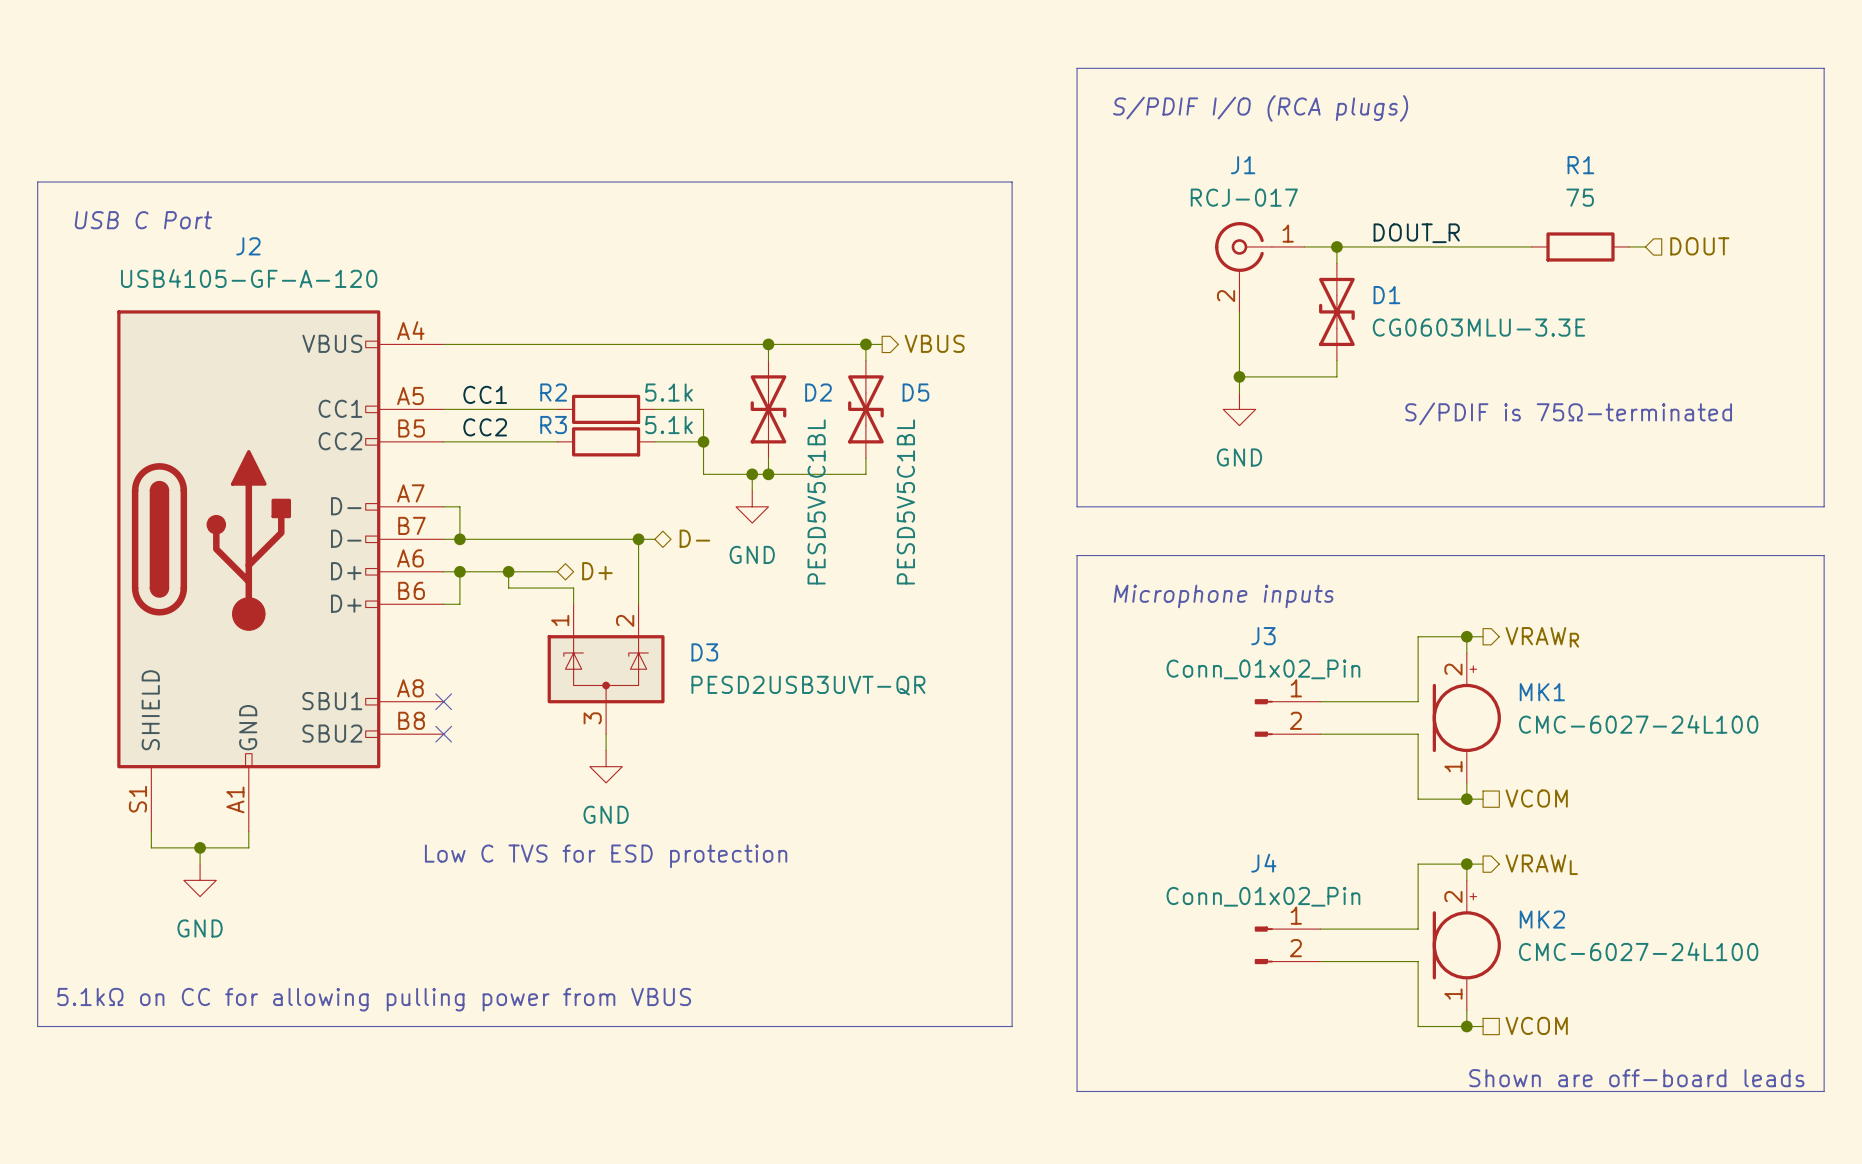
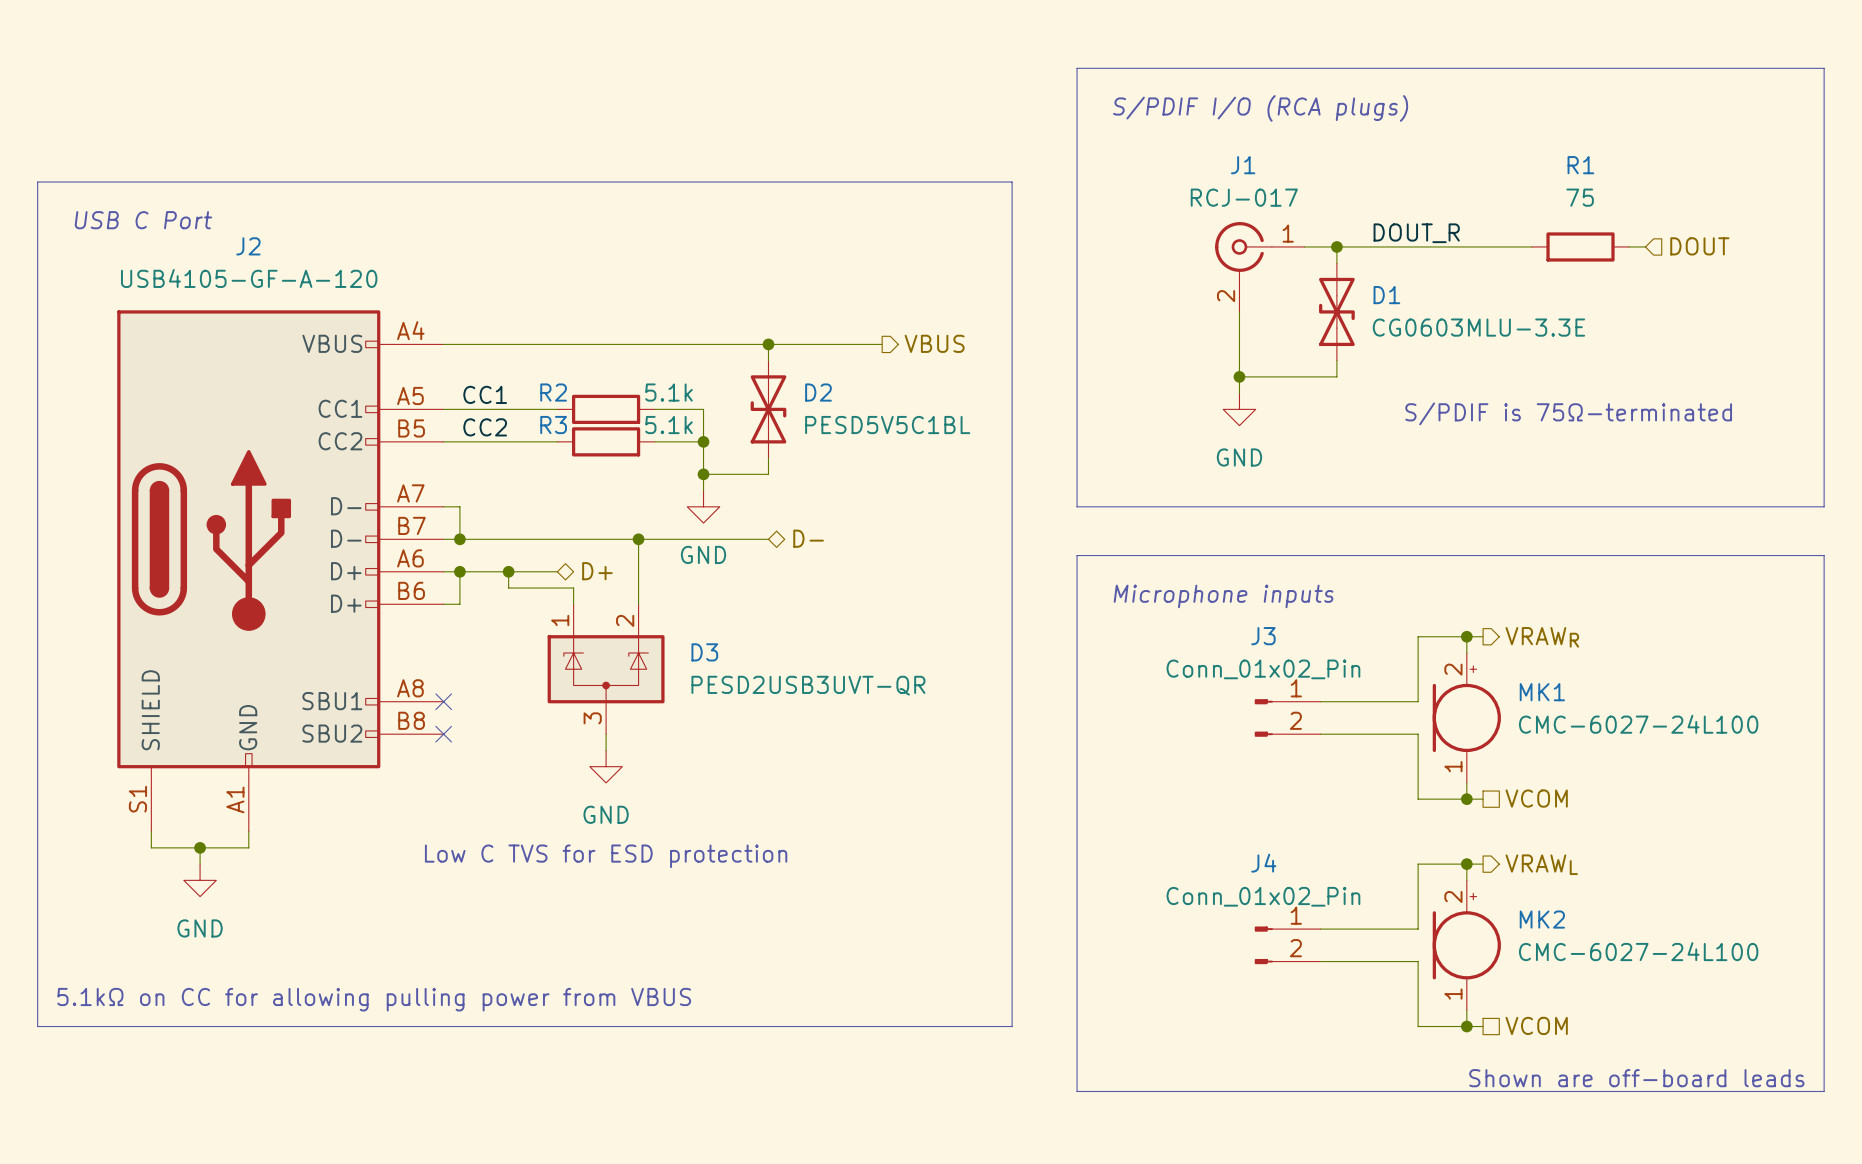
wire: (865, 344) (865, 360) -> none
junction: (865, 344) -> none
D5: PESD5V5C1BL (865, 409) -> none
wire: (865, 458) (865, 474) (768, 474) -> none
junction: none -> (703, 474)
wire: (752, 474) (752, 490) -> (703, 474) (703, 490)
junction: (752, 474) -> none
junction: (768, 474) -> none
D2 value rotation: 0° (816, 501) -> 90° clockwise (887, 425)
power symbol position: GND (752, 506) -> GND (703, 506)
hierarchical label position: D- (694, 538) -> D- (808, 538)
wire: none -> (654, 539) (768, 539)

